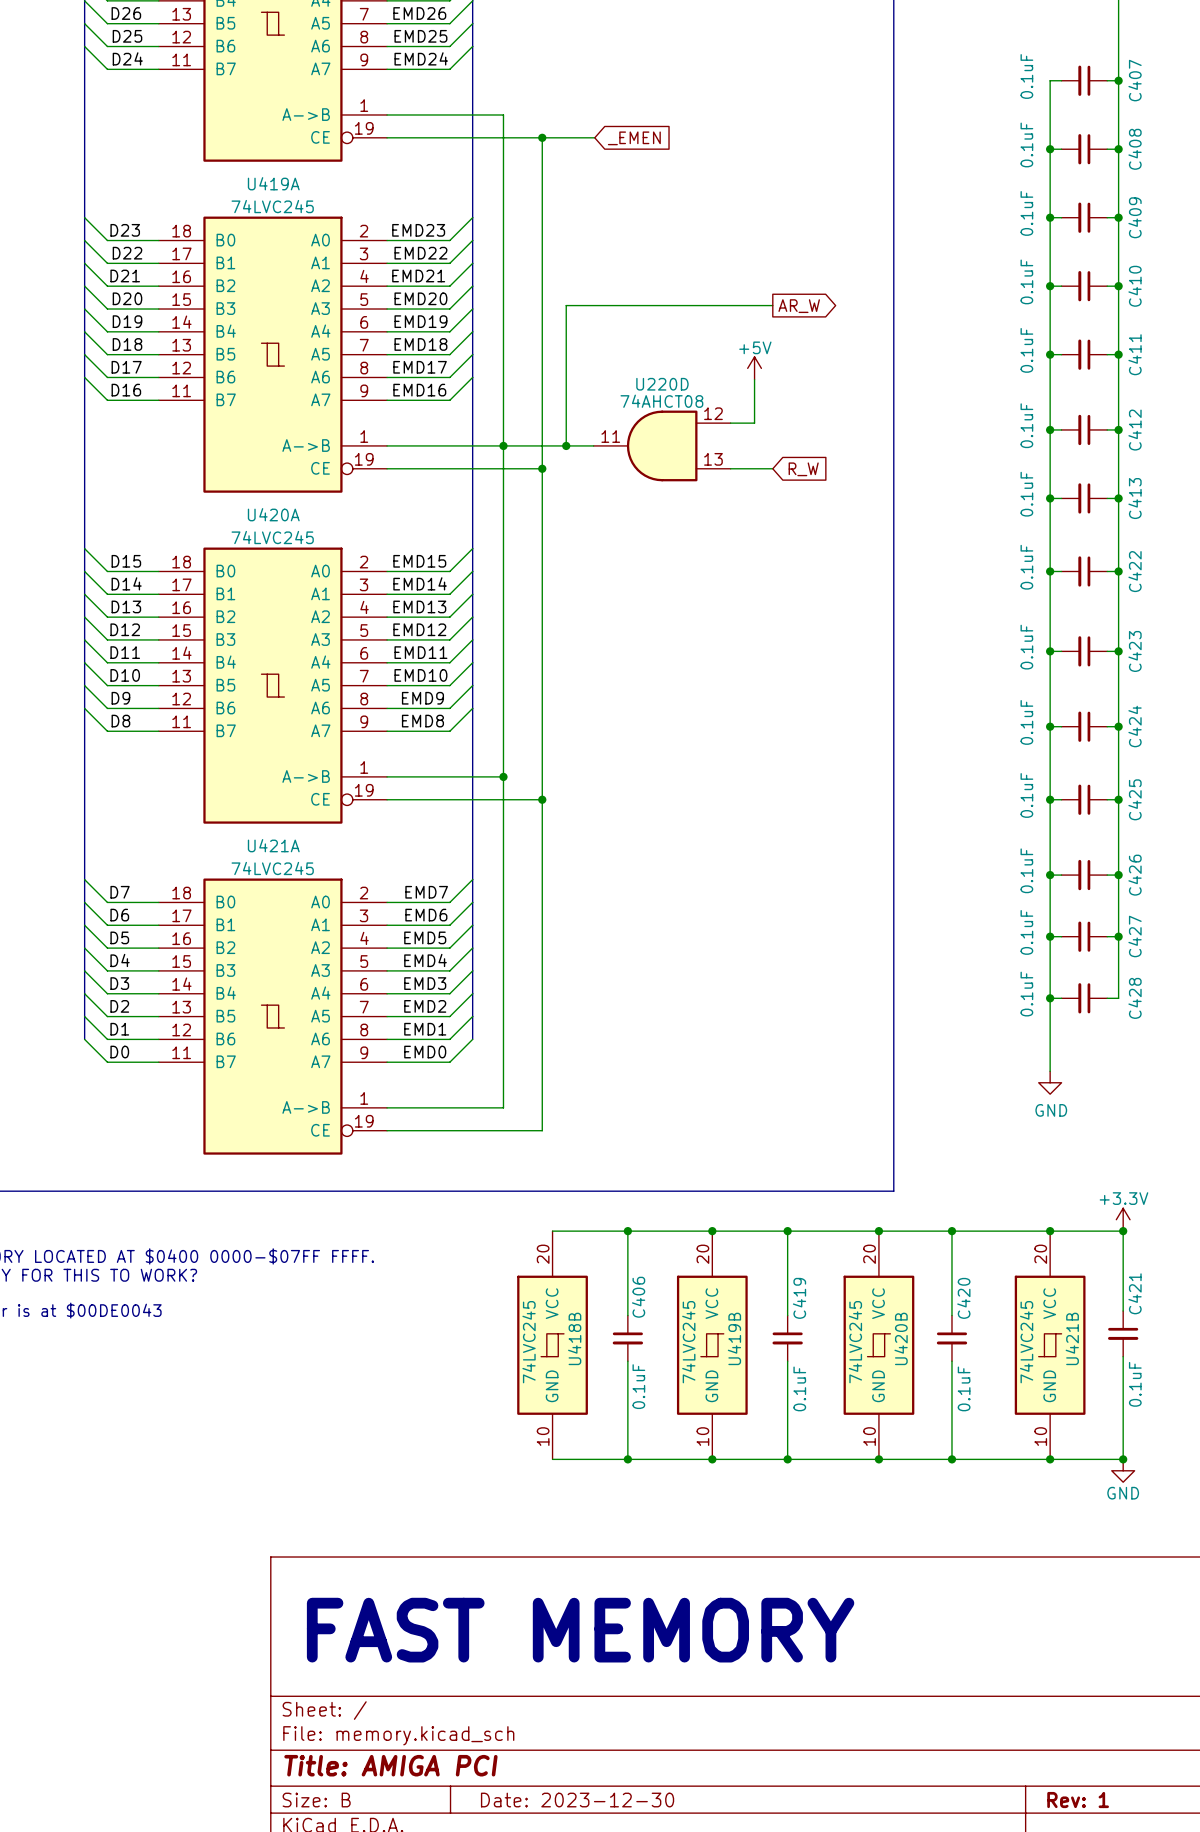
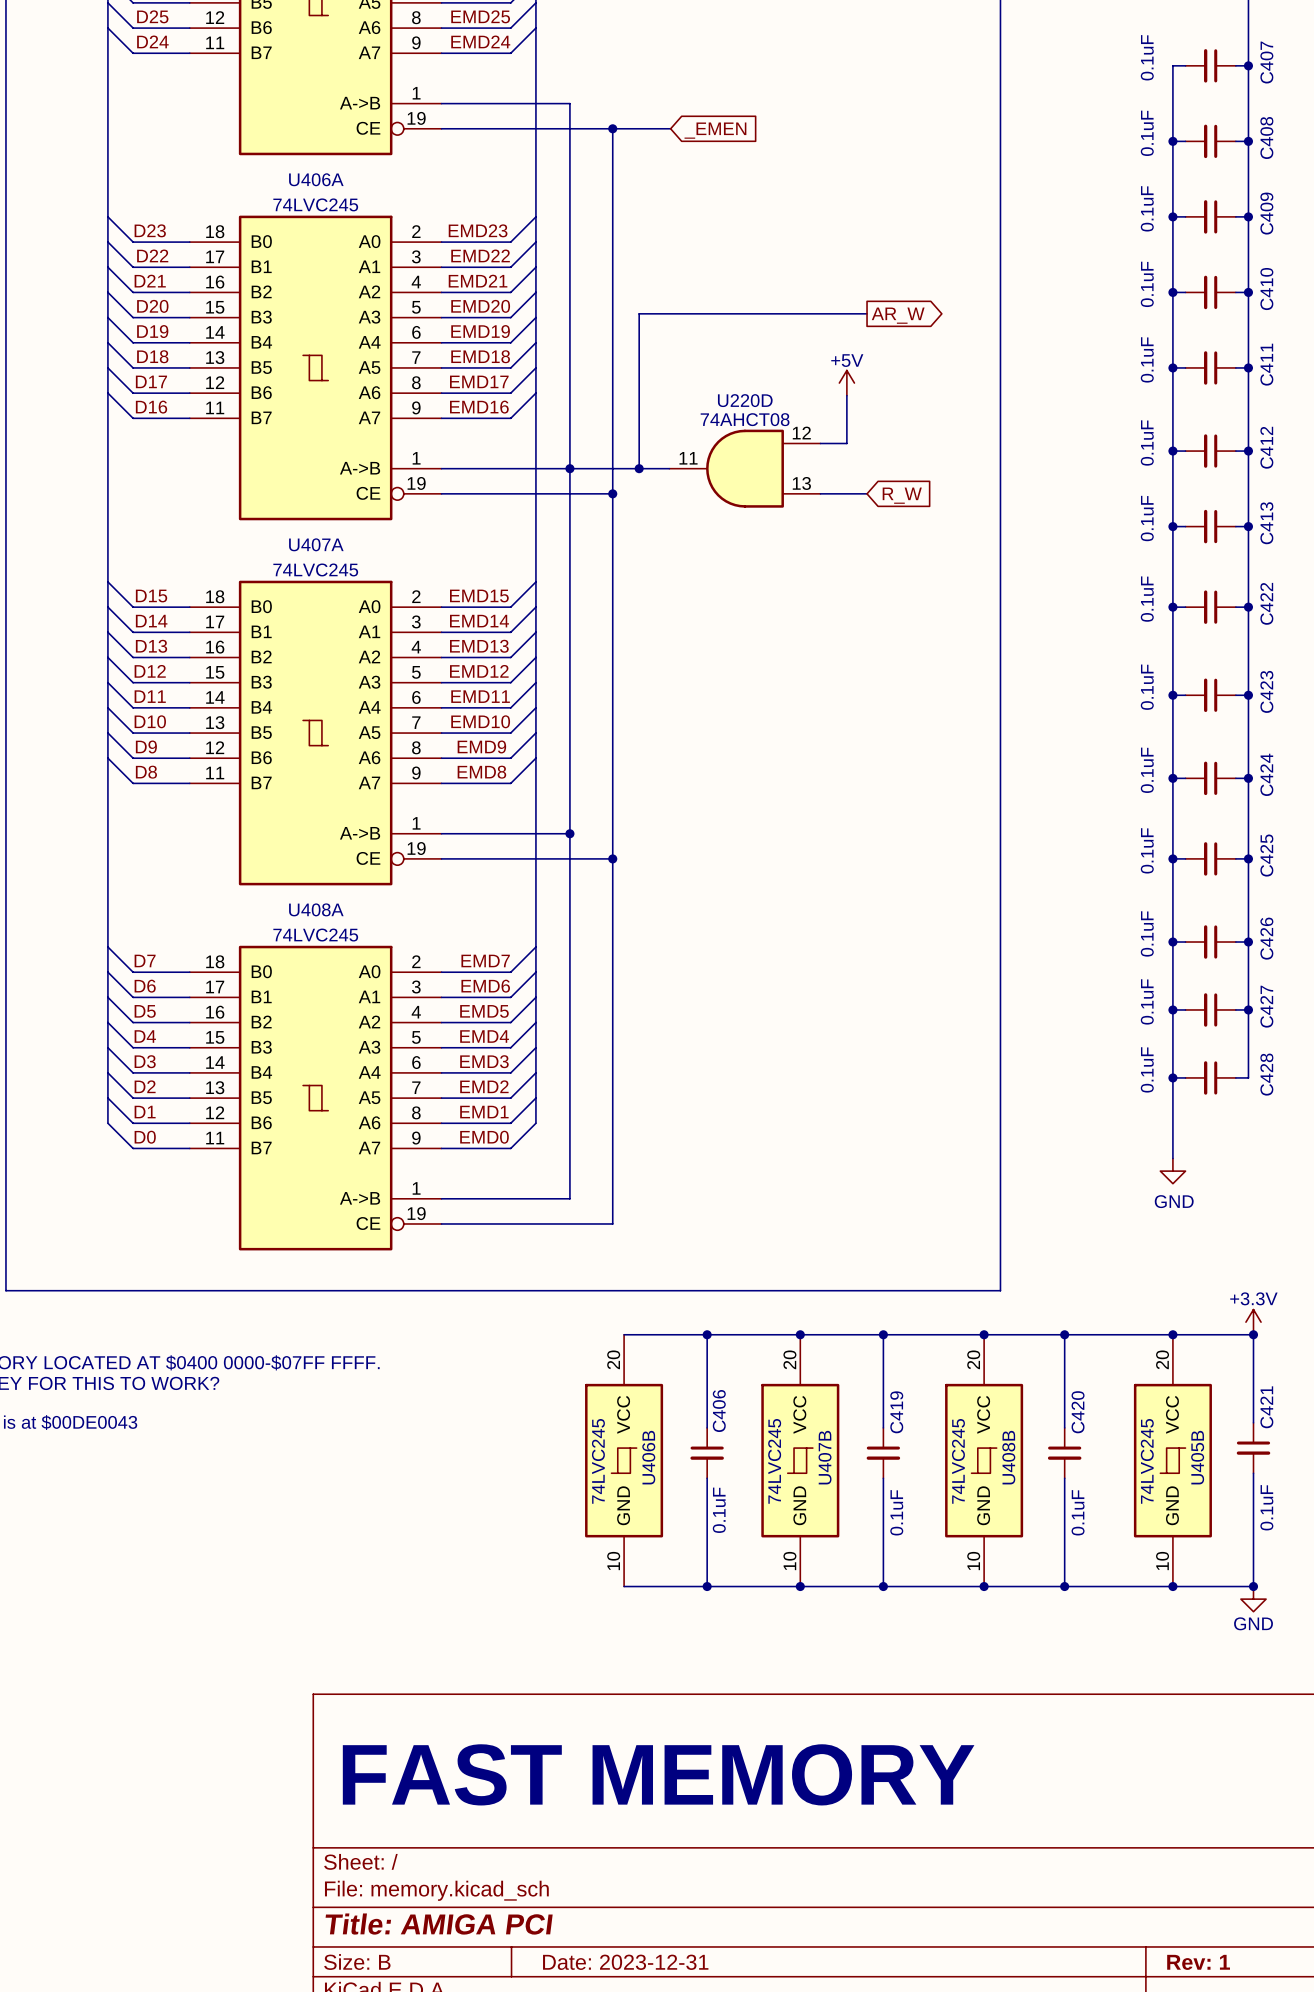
U419A name: U419A (273, 183) -> U406A (316, 179)
U420A name: U420A (273, 514) -> U407A (316, 544)
U421A name: U421A (273, 845) -> U408A (316, 909)
U418B name: U418B (574, 1338) -> U406B (648, 1457)
U419B name: U419B (734, 1338) -> U407B (825, 1457)
U420B name: U420B (901, 1338) -> U408B (1008, 1457)
U421B name: U421B (1072, 1338) -> U405B (1197, 1457)
title block: Date: 2023-12-30 (577, 1800) -> Date: 2023-12-31 (625, 1962)

